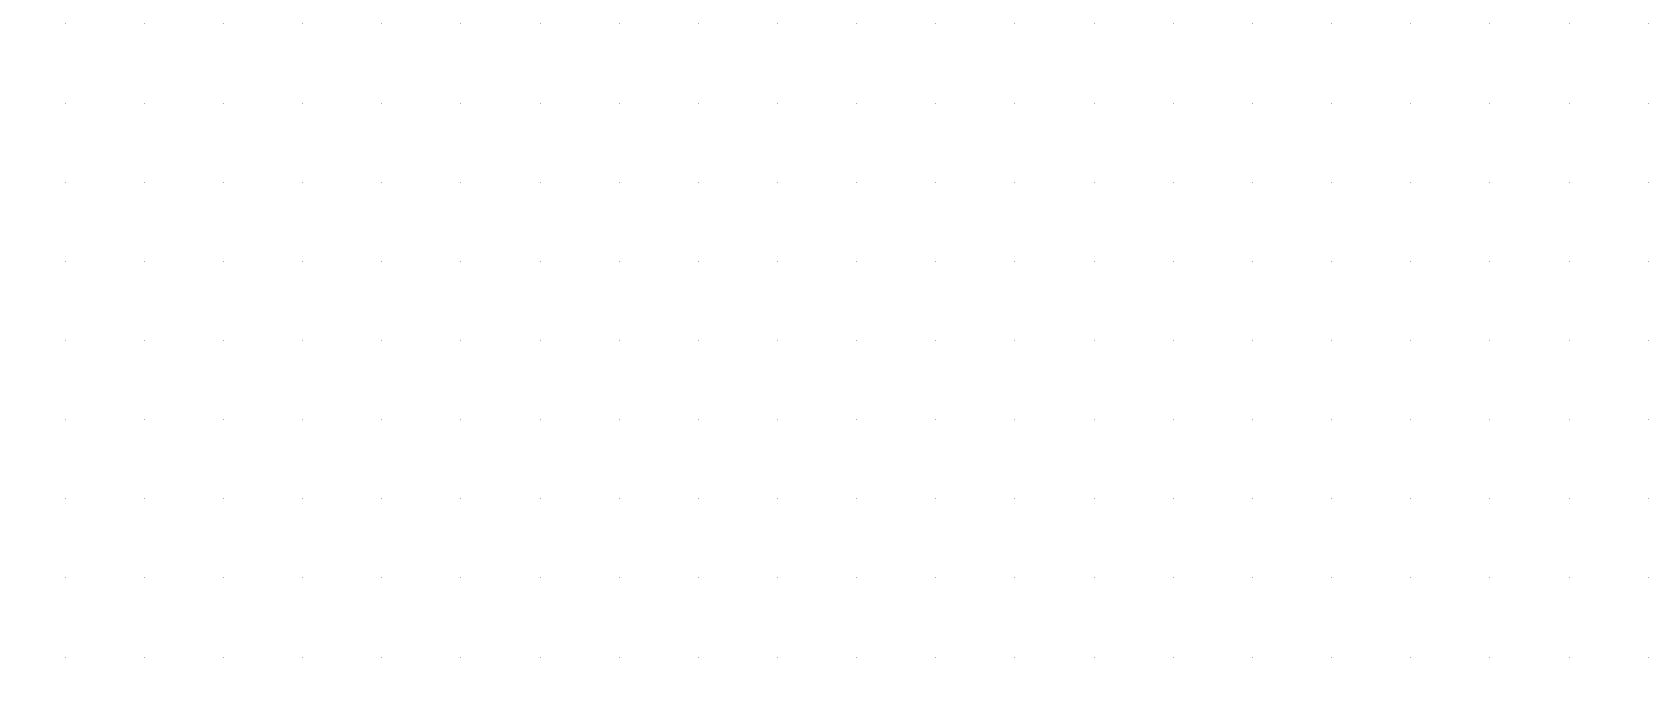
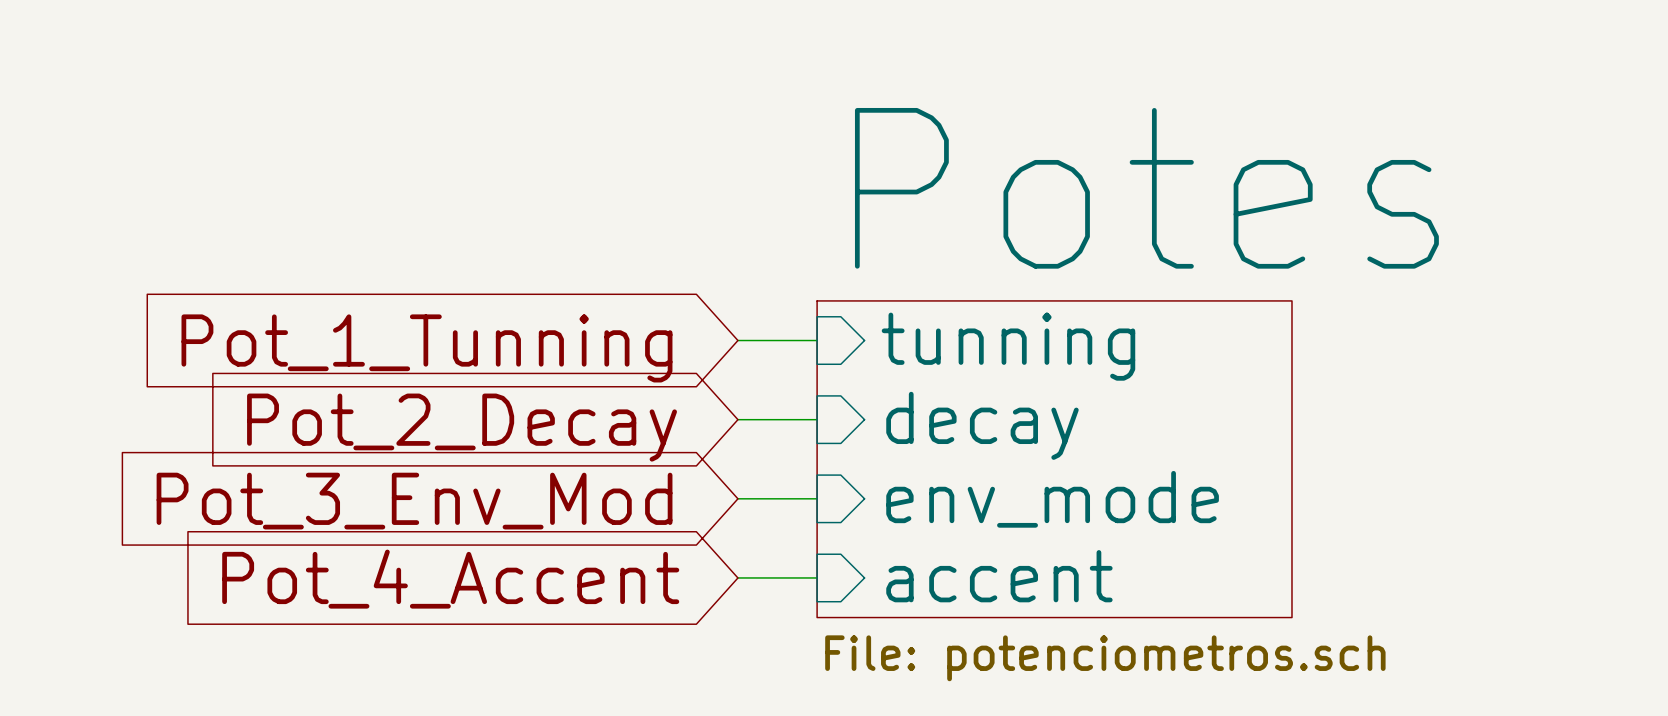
wire: none -> (737, 340) (817, 340)
sheet pin: none -> tunning (1008, 346)
global label: none -> Pot_1_Tunning (426, 348)
wire: none -> (737, 419) (817, 419)
sheet pin: none -> decay (982, 425)
global label: none -> Pot_2_Decay (462, 427)
sheet Potes: none -> File: potenciometros.sch (1054, 459)
wire: none -> (737, 498) (817, 498)
sheet pin: none -> env_mode (1052, 499)
global label: none -> Pot_3_Env_Mod (414, 501)
sheet pin: none -> accent (999, 576)
wire: none -> (737, 577) (817, 577)
global label: none -> Pot_4_Accent (450, 579)

